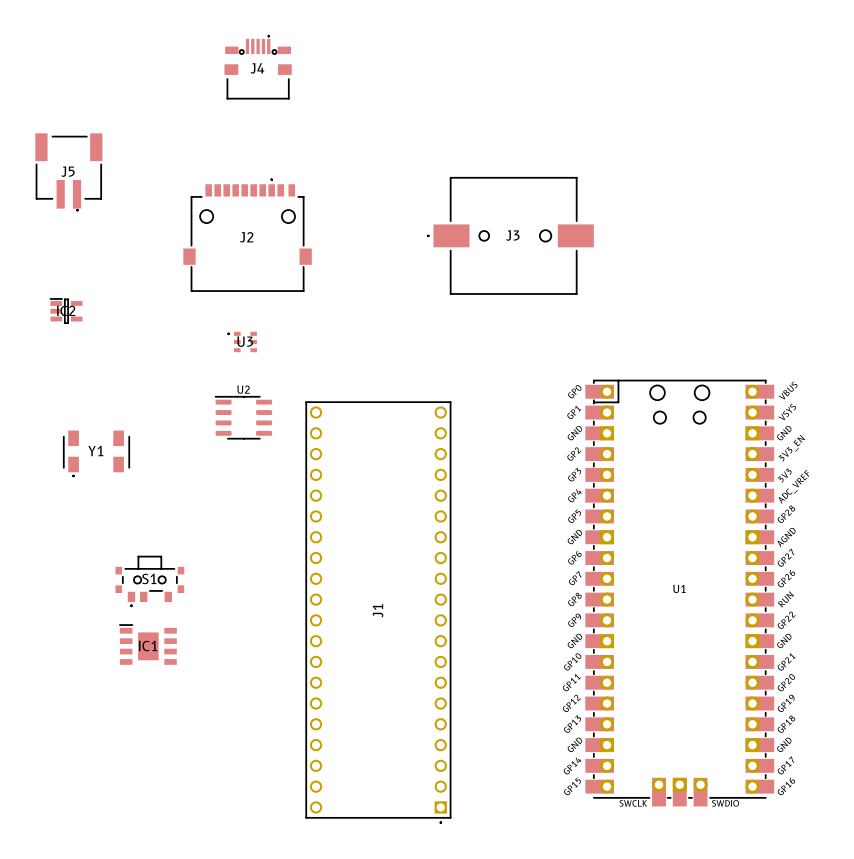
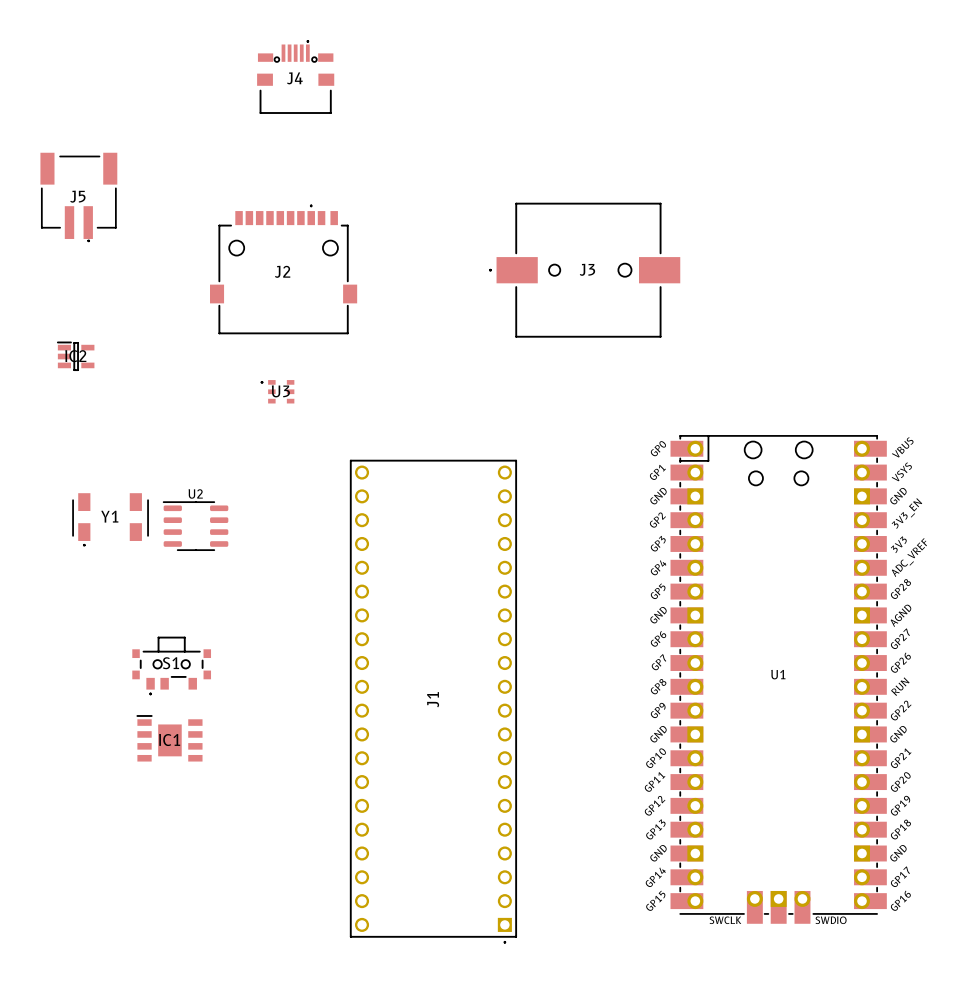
U2 position: (243, 417) -> (195, 526)

